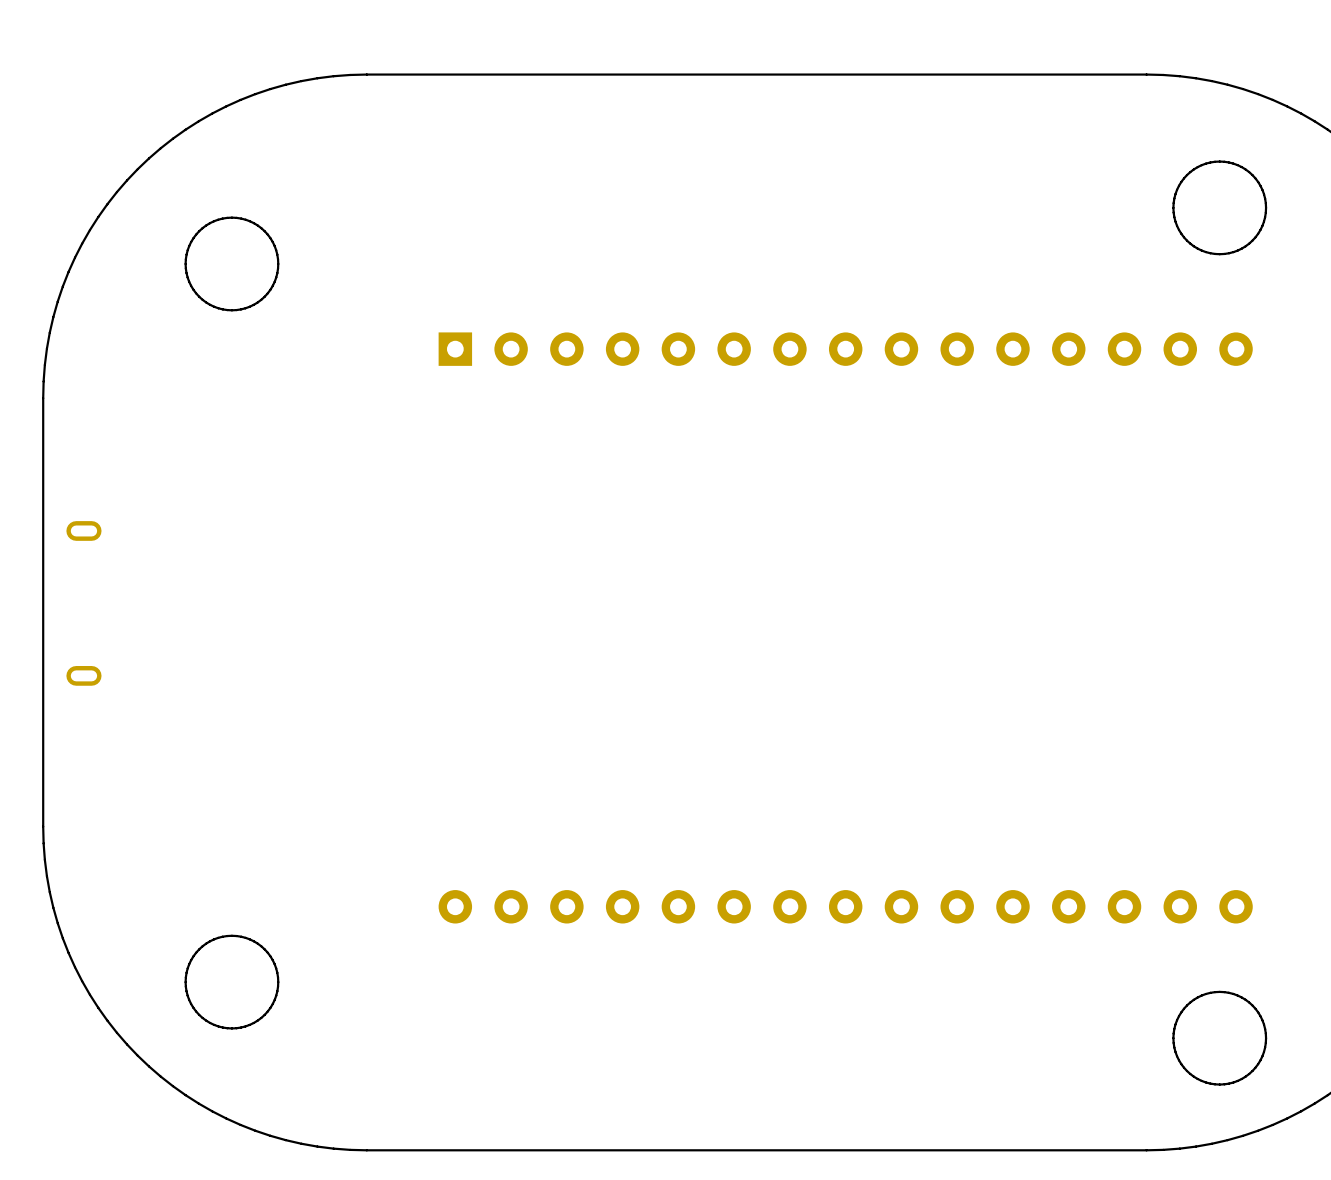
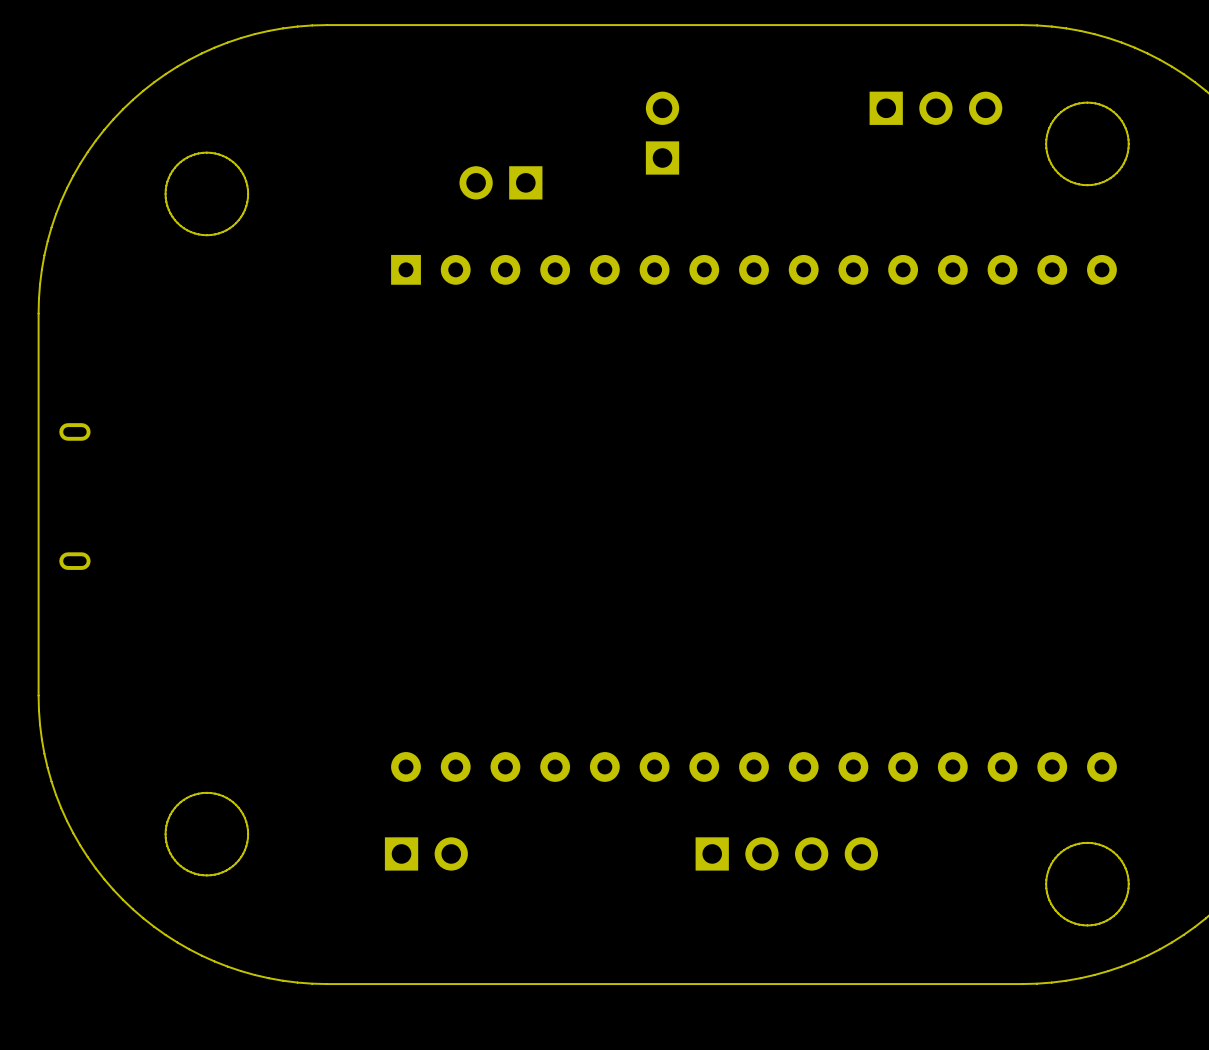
part: none -> (935, 108)
part: none -> (662, 133)
part: none -> (500, 182)
part: none -> (426, 853)
part: none -> (786, 853)

